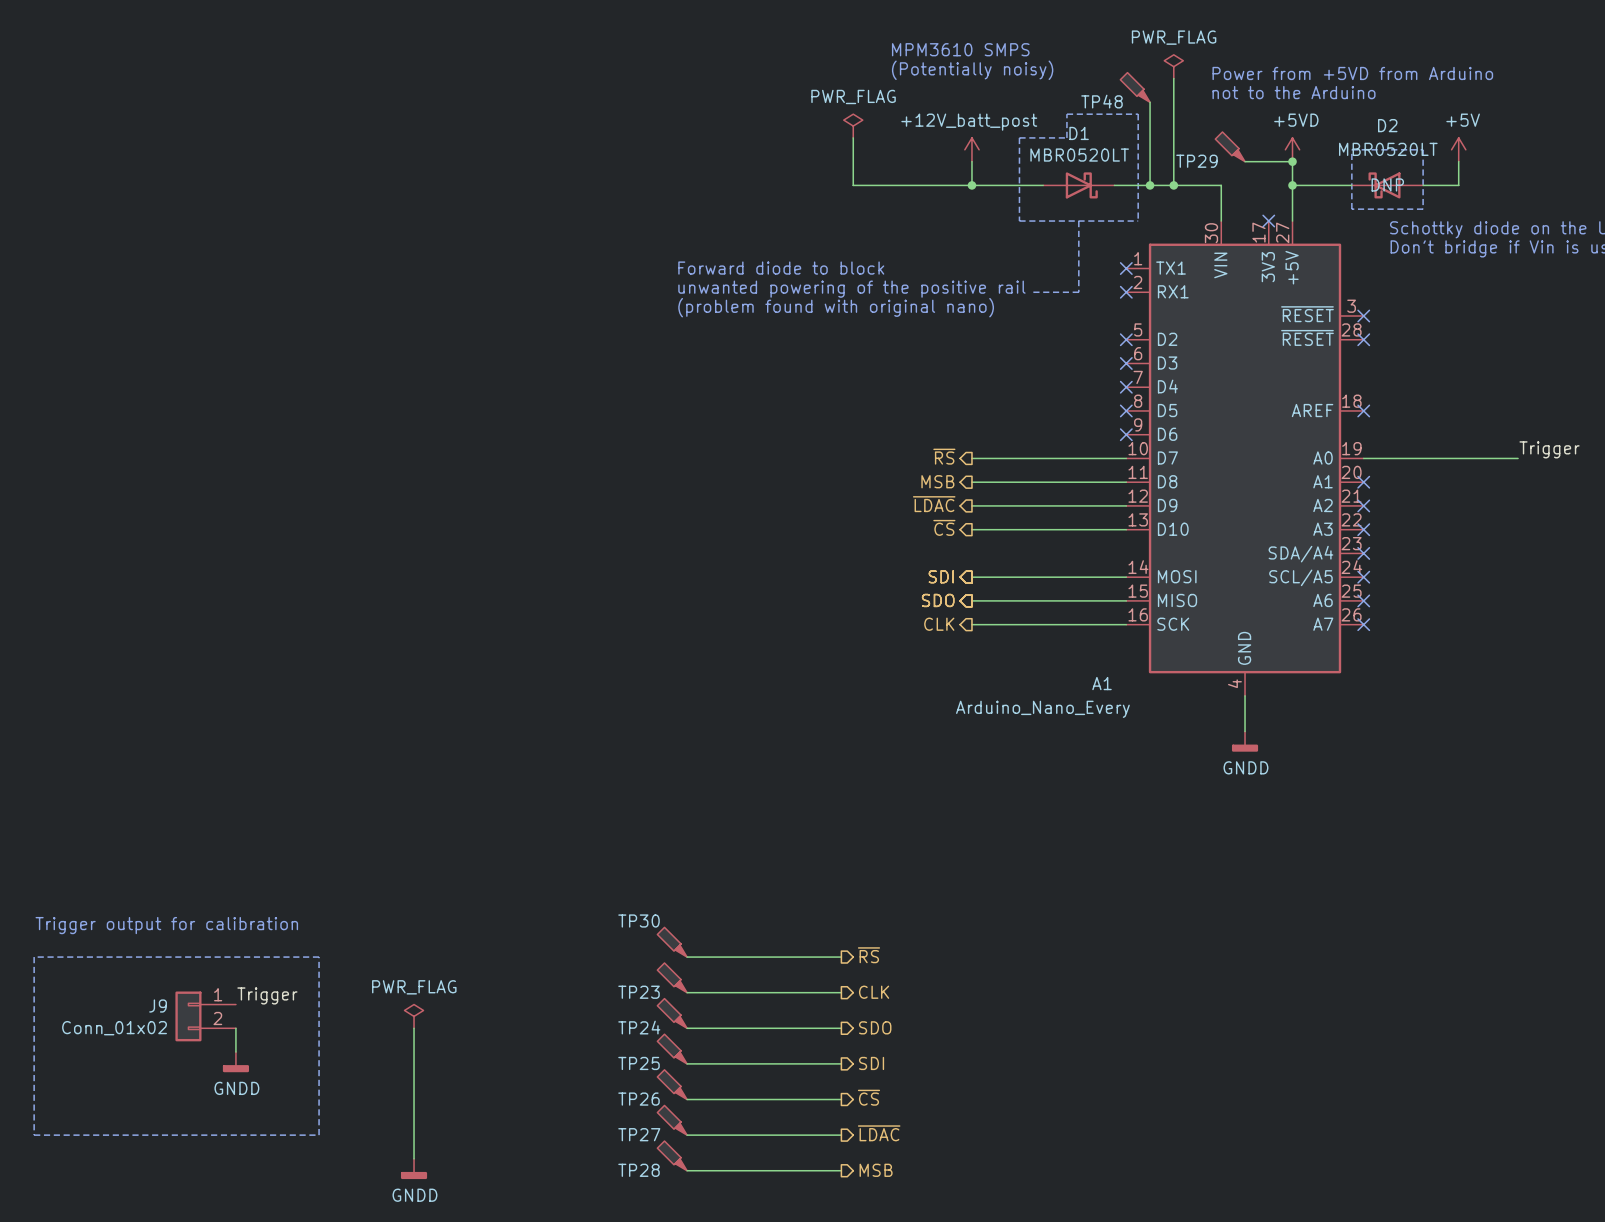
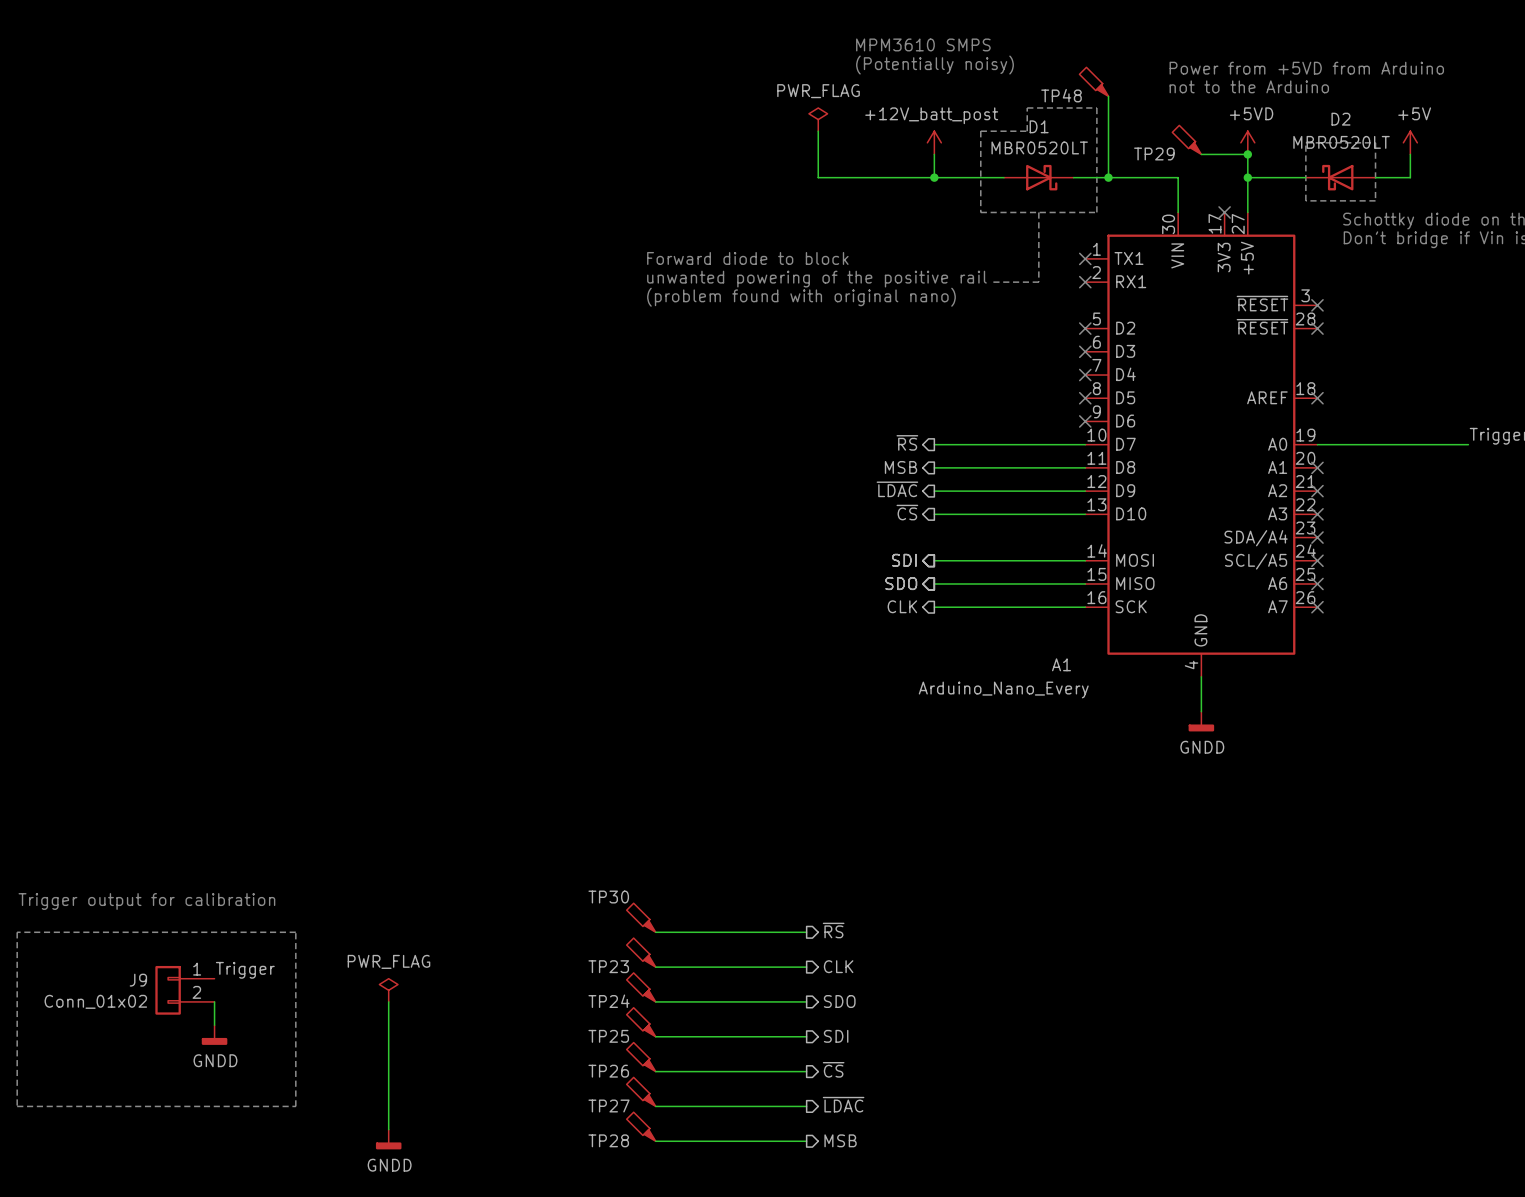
power symbol: PWR_FLAG (1173, 66) -> none
wire: (1173, 78) (1173, 185) -> none
D2 text: DNP (1387, 184) -> none
junction: (1173, 185) -> none

